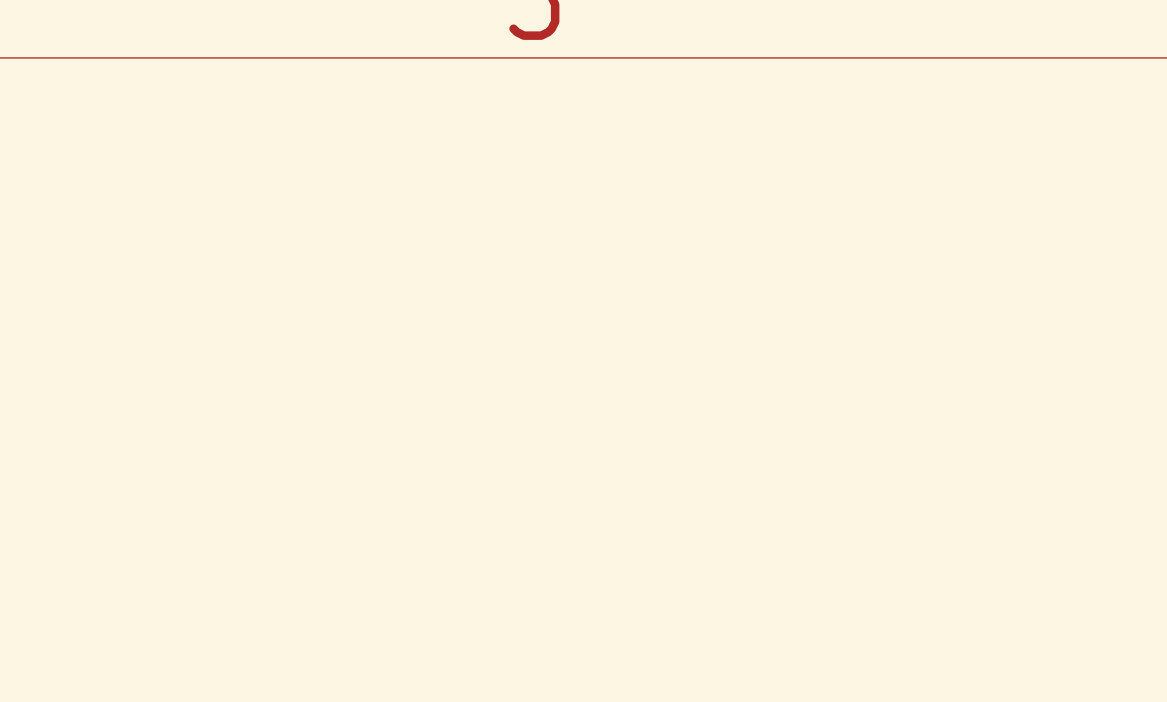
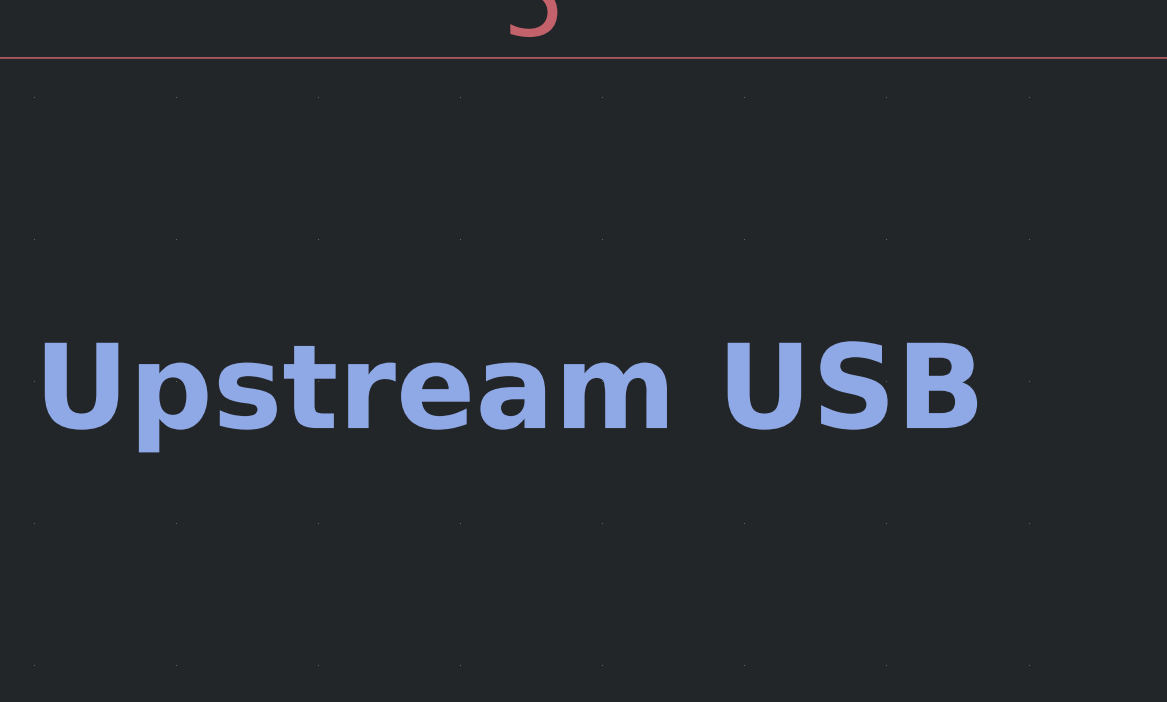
text: none -> Upstream USB (510, 396)

